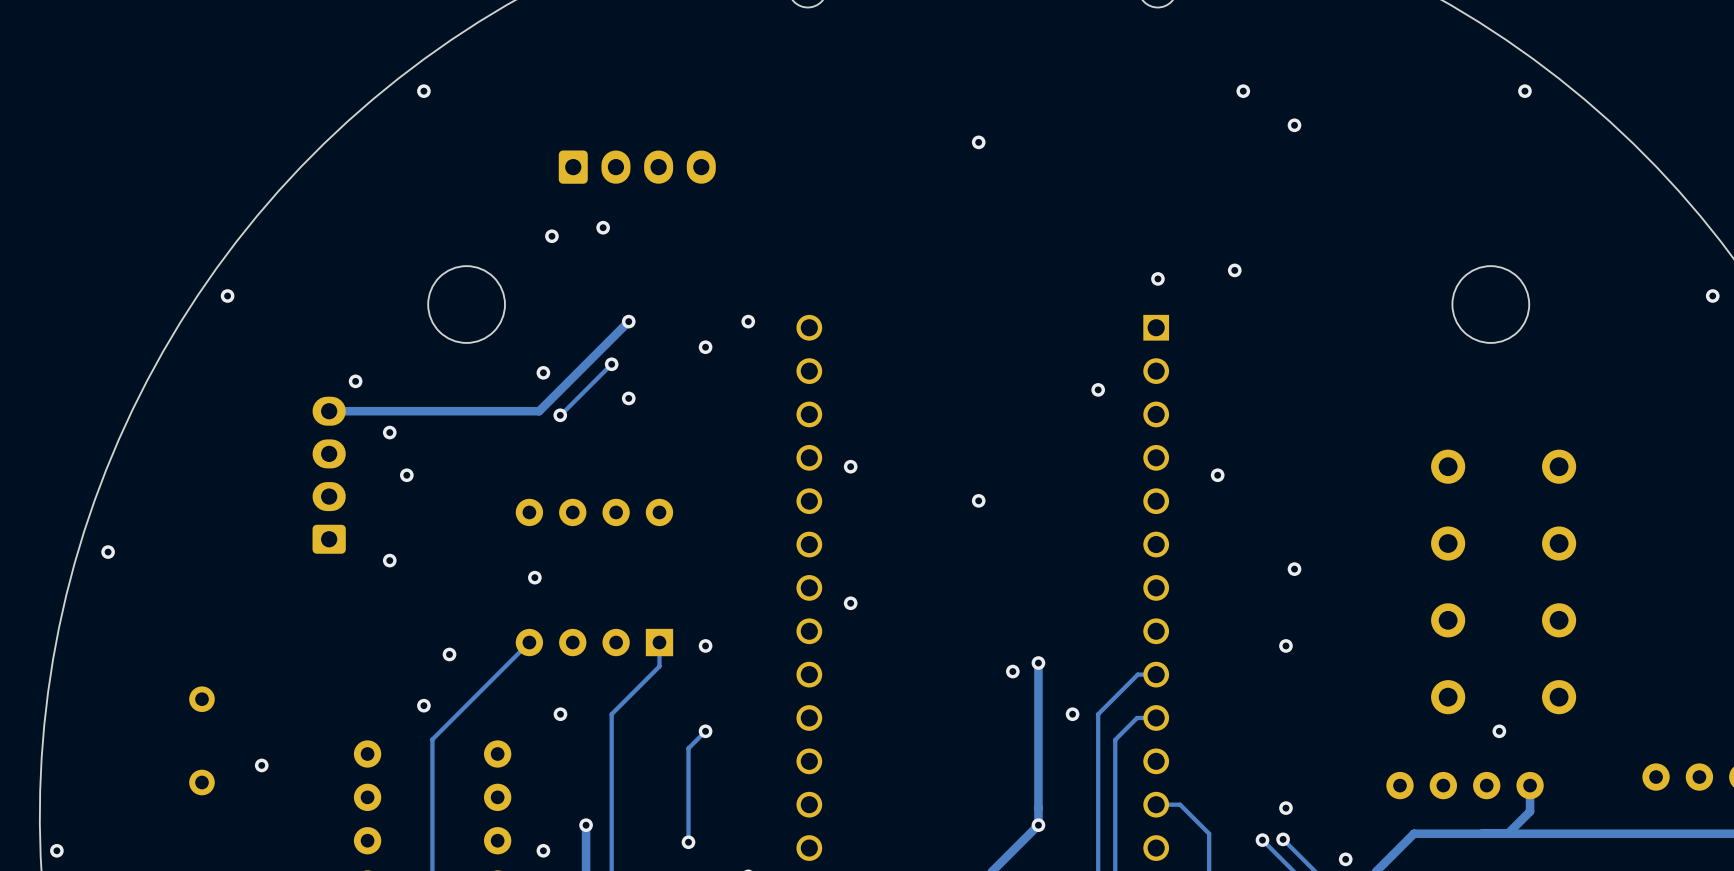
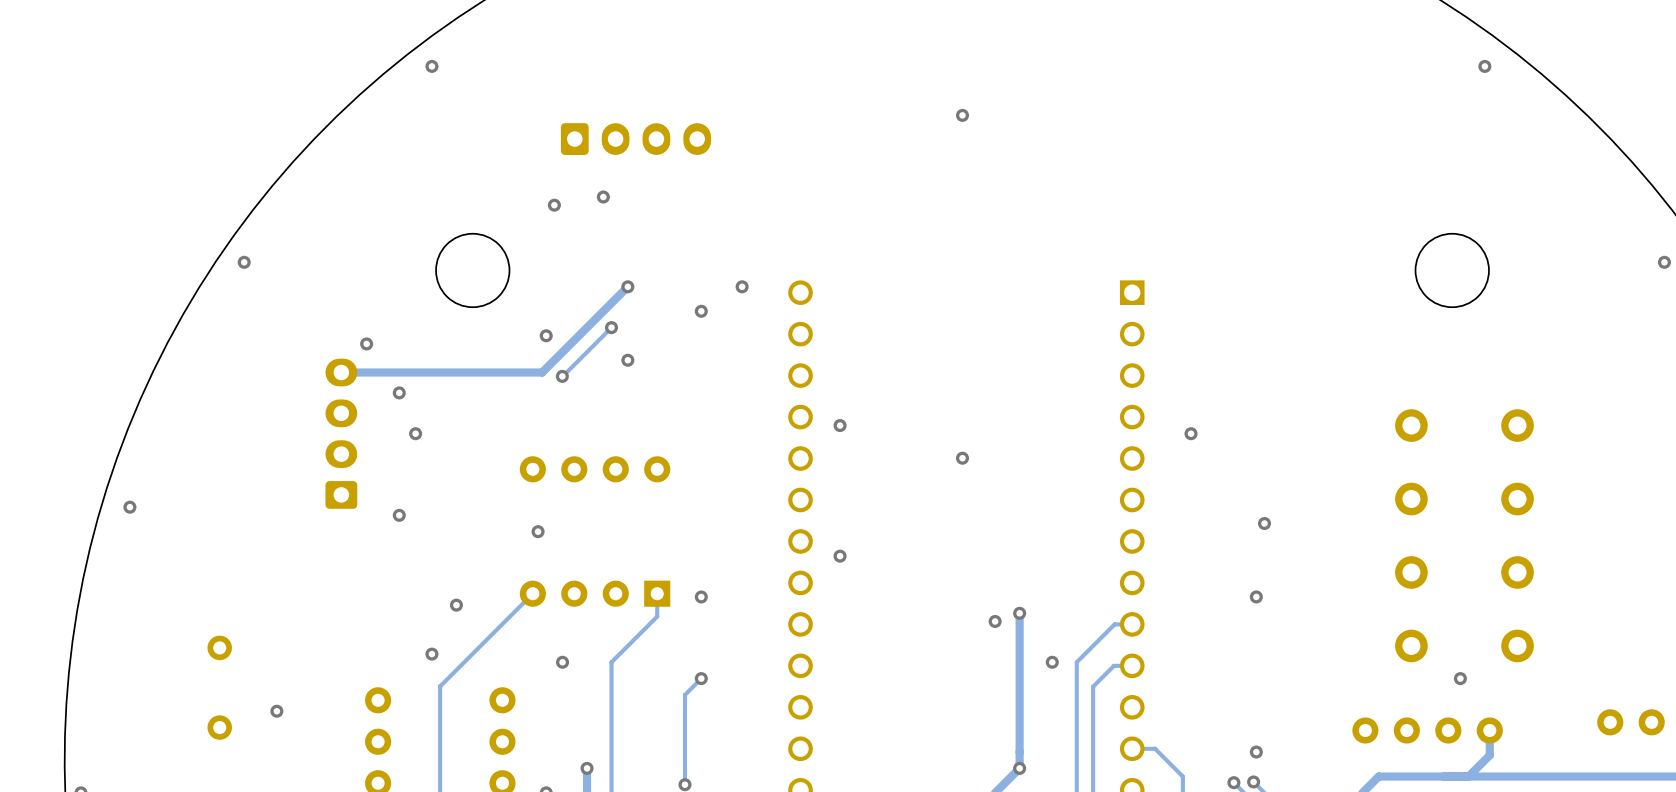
via: (1243, 91) -> none
via: (1294, 125) -> none
via: (1234, 270) -> none
via: (1157, 278) -> none
via: (1098, 389) -> none

